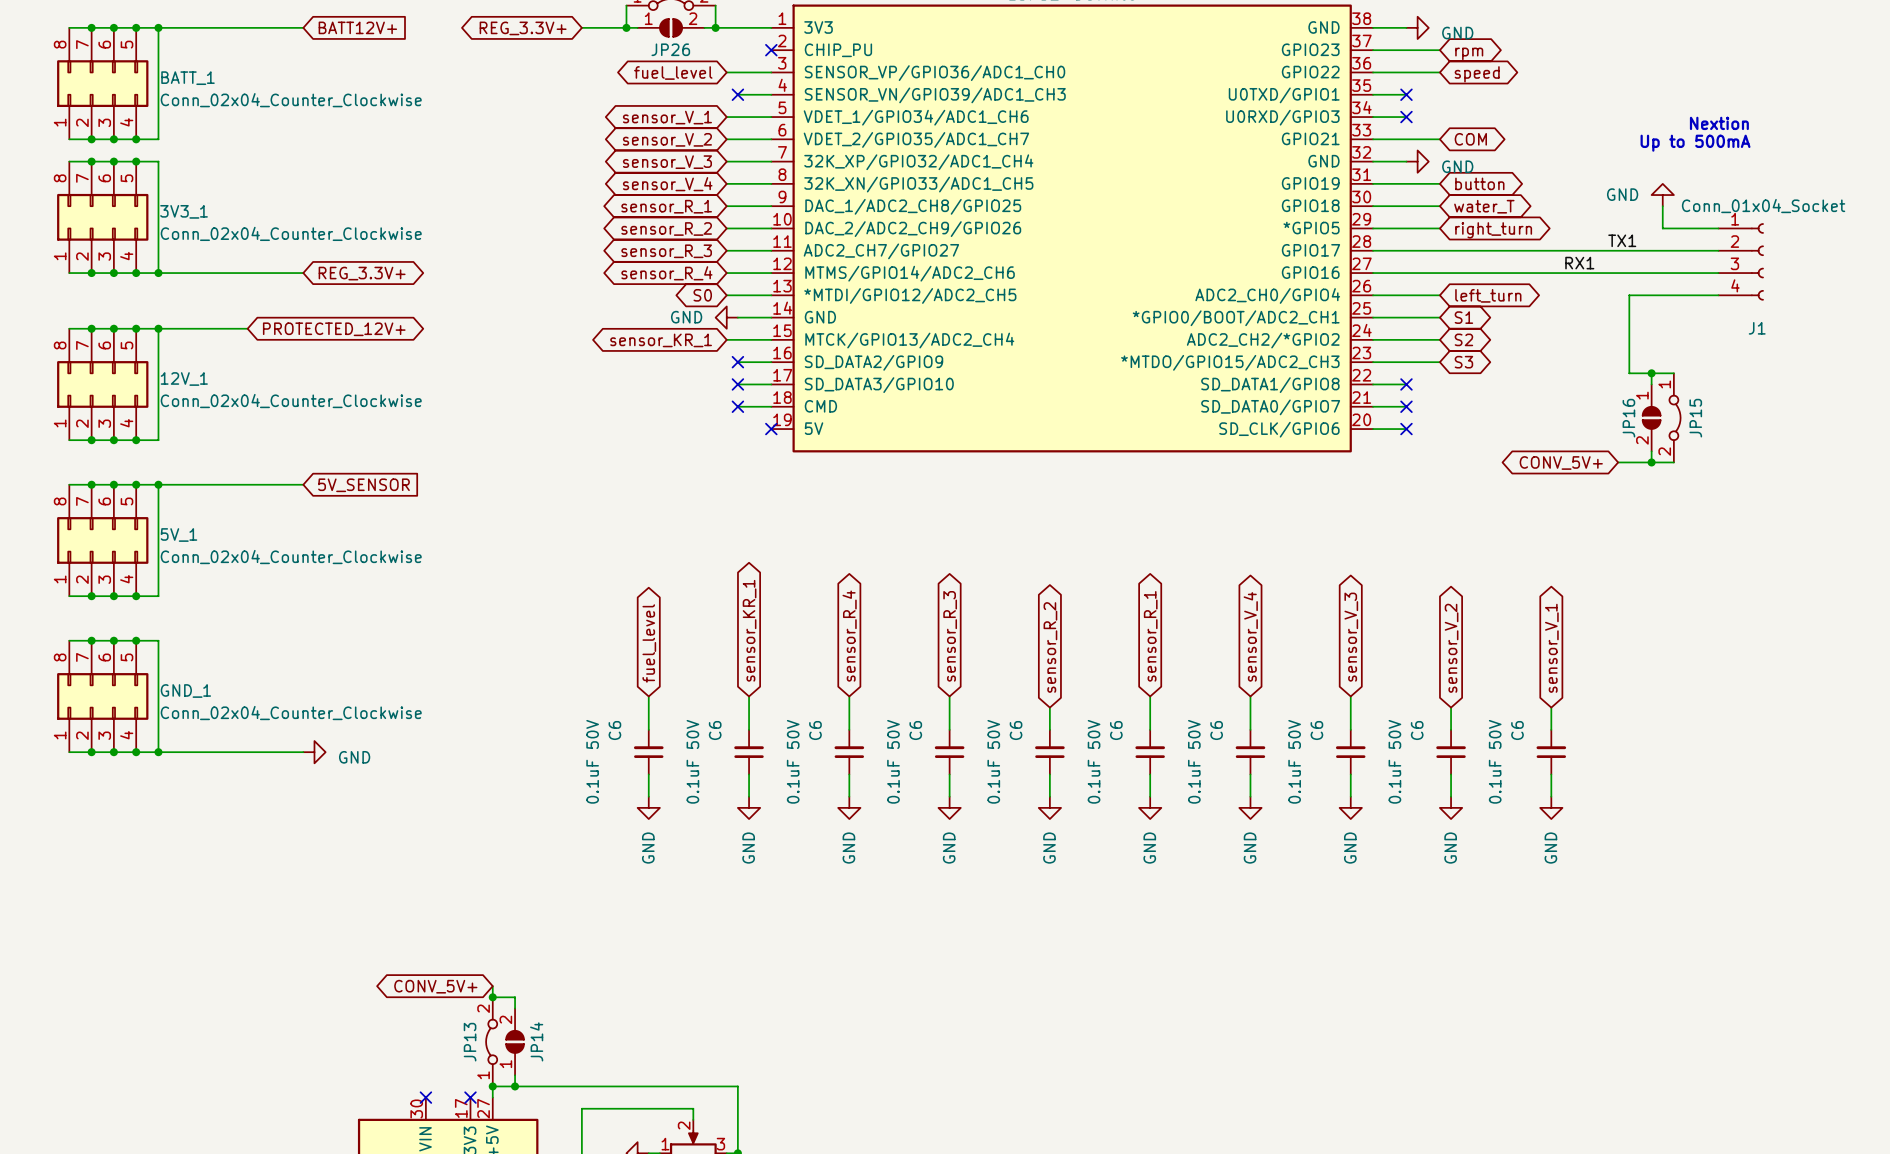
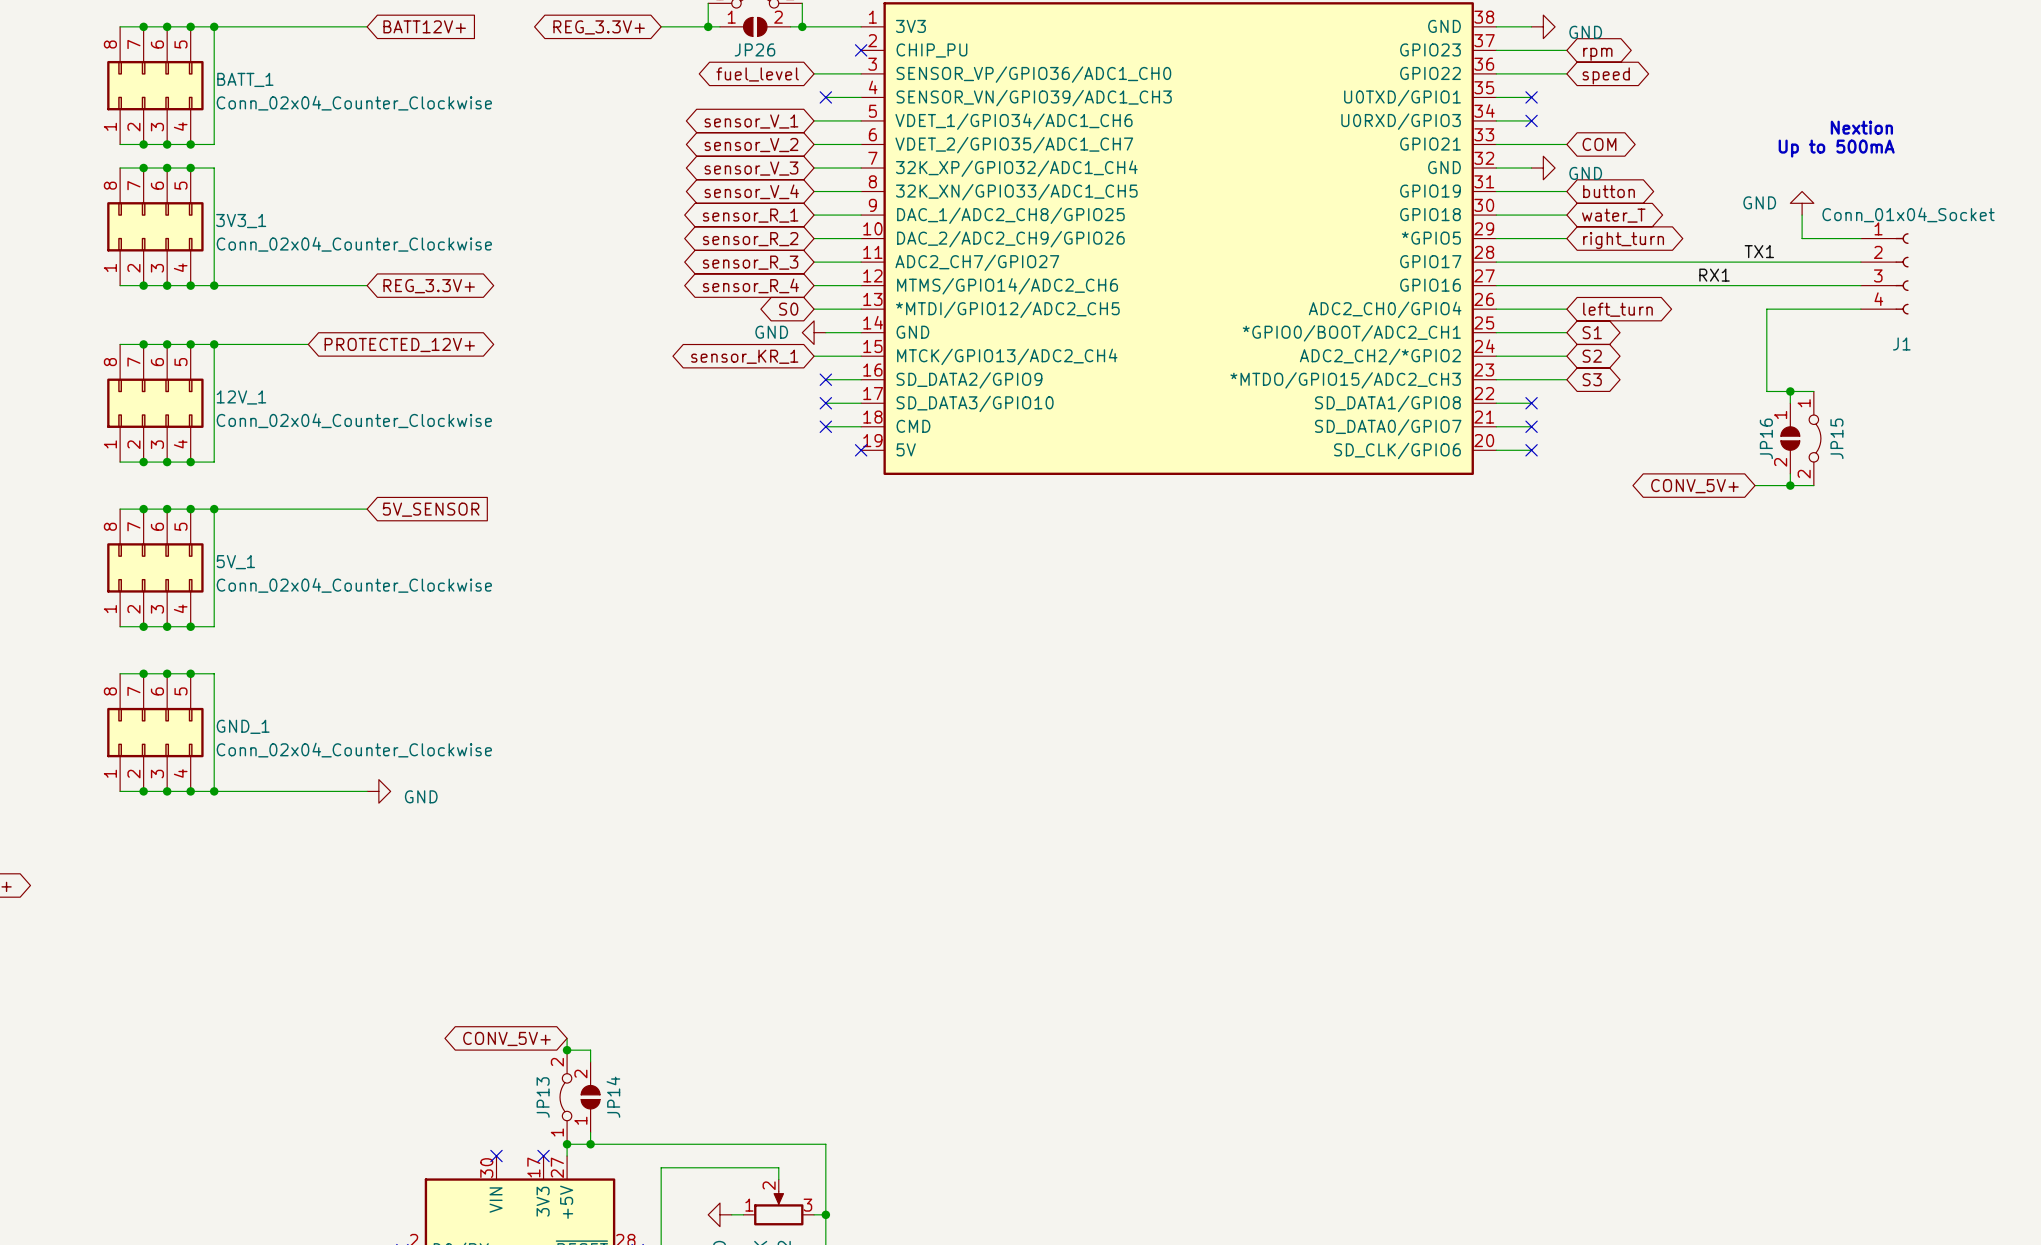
global label: sensor_KR_1 (749, 630) -> none
global label: sensor_R_4 (849, 636) -> none
global label: sensor_R_3 (950, 636) -> none
global label: sensor_R_1 (1150, 636) -> none
global label: sensor_V_4 (1250, 636) -> none
global label: sensor_V_3 (1351, 637) -> none
global label: fuel_level (649, 643) -> none
global label: sensor_R_2 (1050, 647) -> none
global label: sensor_V_2 (1451, 648) -> none
global label: sensor_V_1 (1551, 648) -> none
wire: (648, 696) (648, 729) -> none
wire: (749, 696) (749, 729) -> none
wire: (849, 696) (849, 729) -> none
wire: (949, 696) (949, 729) -> none
wire: (1150, 696) (1150, 729) -> none
wire: (1250, 696) (1250, 729) -> none
wire: (1350, 696) (1350, 729) -> none
wire: (1049, 707) (1049, 729) -> none
wire: (1451, 707) (1451, 729) -> none
wire: (1551, 707) (1551, 729) -> none
C6: 0.1uF 50V (648, 752) -> none
C6: 0.1uF 50V (749, 752) -> none
C6: 0.1uF 50V (849, 752) -> none
C6: 0.1uF 50V (949, 752) -> none
C6: 0.1uF 50V (1049, 752) -> none
C6: 0.1uF 50V (1150, 752) -> none
C6: 0.1uF 50V (1250, 752) -> none
C6: 0.1uF 50V (1350, 752) -> none
C6: 0.1uF 50V (1451, 752) -> none
C6: 0.1uF 50V (1551, 752) -> none
wire: (648, 774) (648, 796) -> none
wire: (749, 774) (749, 796) -> none
wire: (849, 774) (849, 796) -> none
wire: (949, 774) (949, 796) -> none
wire: (1049, 774) (1049, 796) -> none
wire: (1150, 774) (1150, 796) -> none
wire: (1250, 774) (1250, 796) -> none
wire: (1350, 774) (1350, 796) -> none
wire: (1451, 774) (1451, 796) -> none
wire: (1551, 774) (1551, 796) -> none
power symbol: GND (648, 807) -> none
power symbol: GND (749, 807) -> none
power symbol: GND (849, 807) -> none
power symbol: GND (949, 807) -> none
power symbol: GND (1049, 807) -> none
power symbol: GND (1150, 807) -> none
power symbol: GND (1250, 807) -> none
power symbol: GND (1350, 807) -> none
power symbol: GND (1451, 807) -> none
power symbol: GND (1551, 807) -> none

